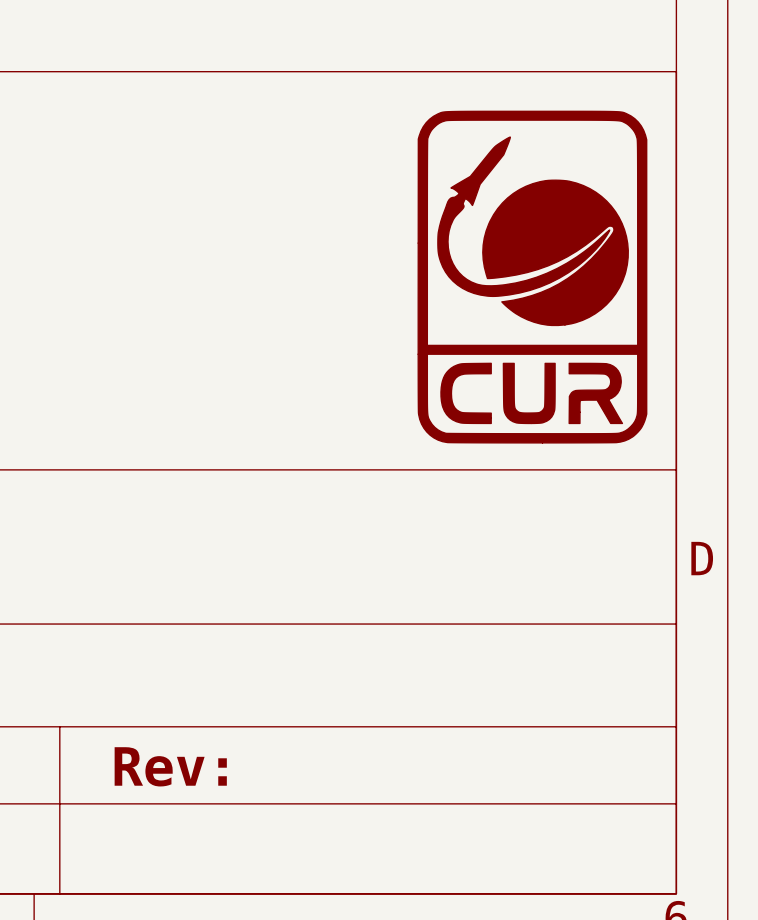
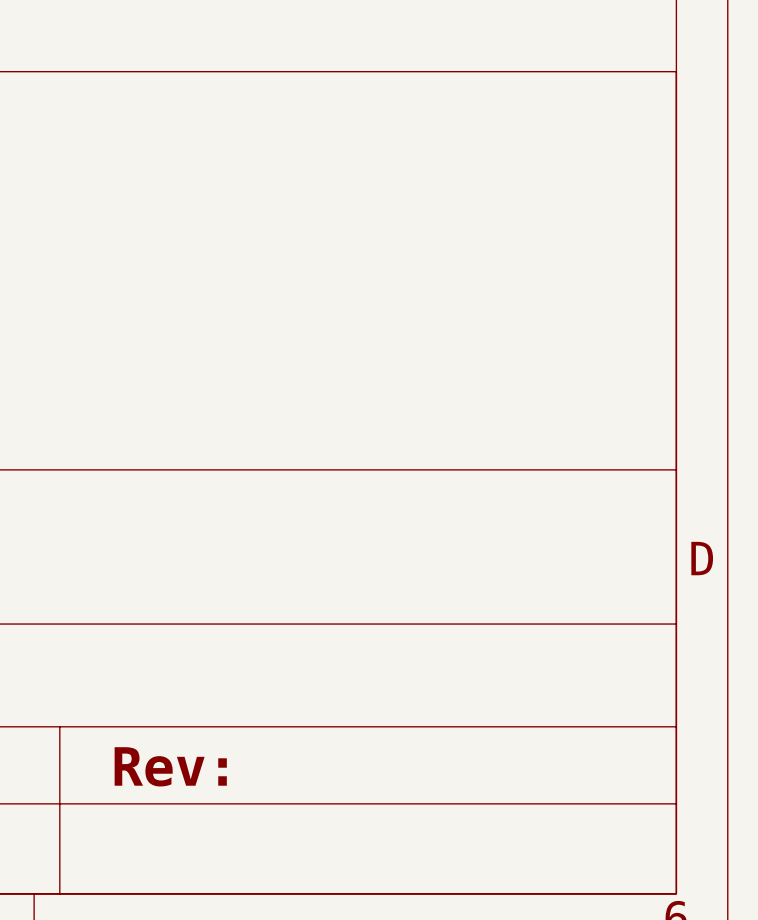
power symbol: (532, 277) -> none

